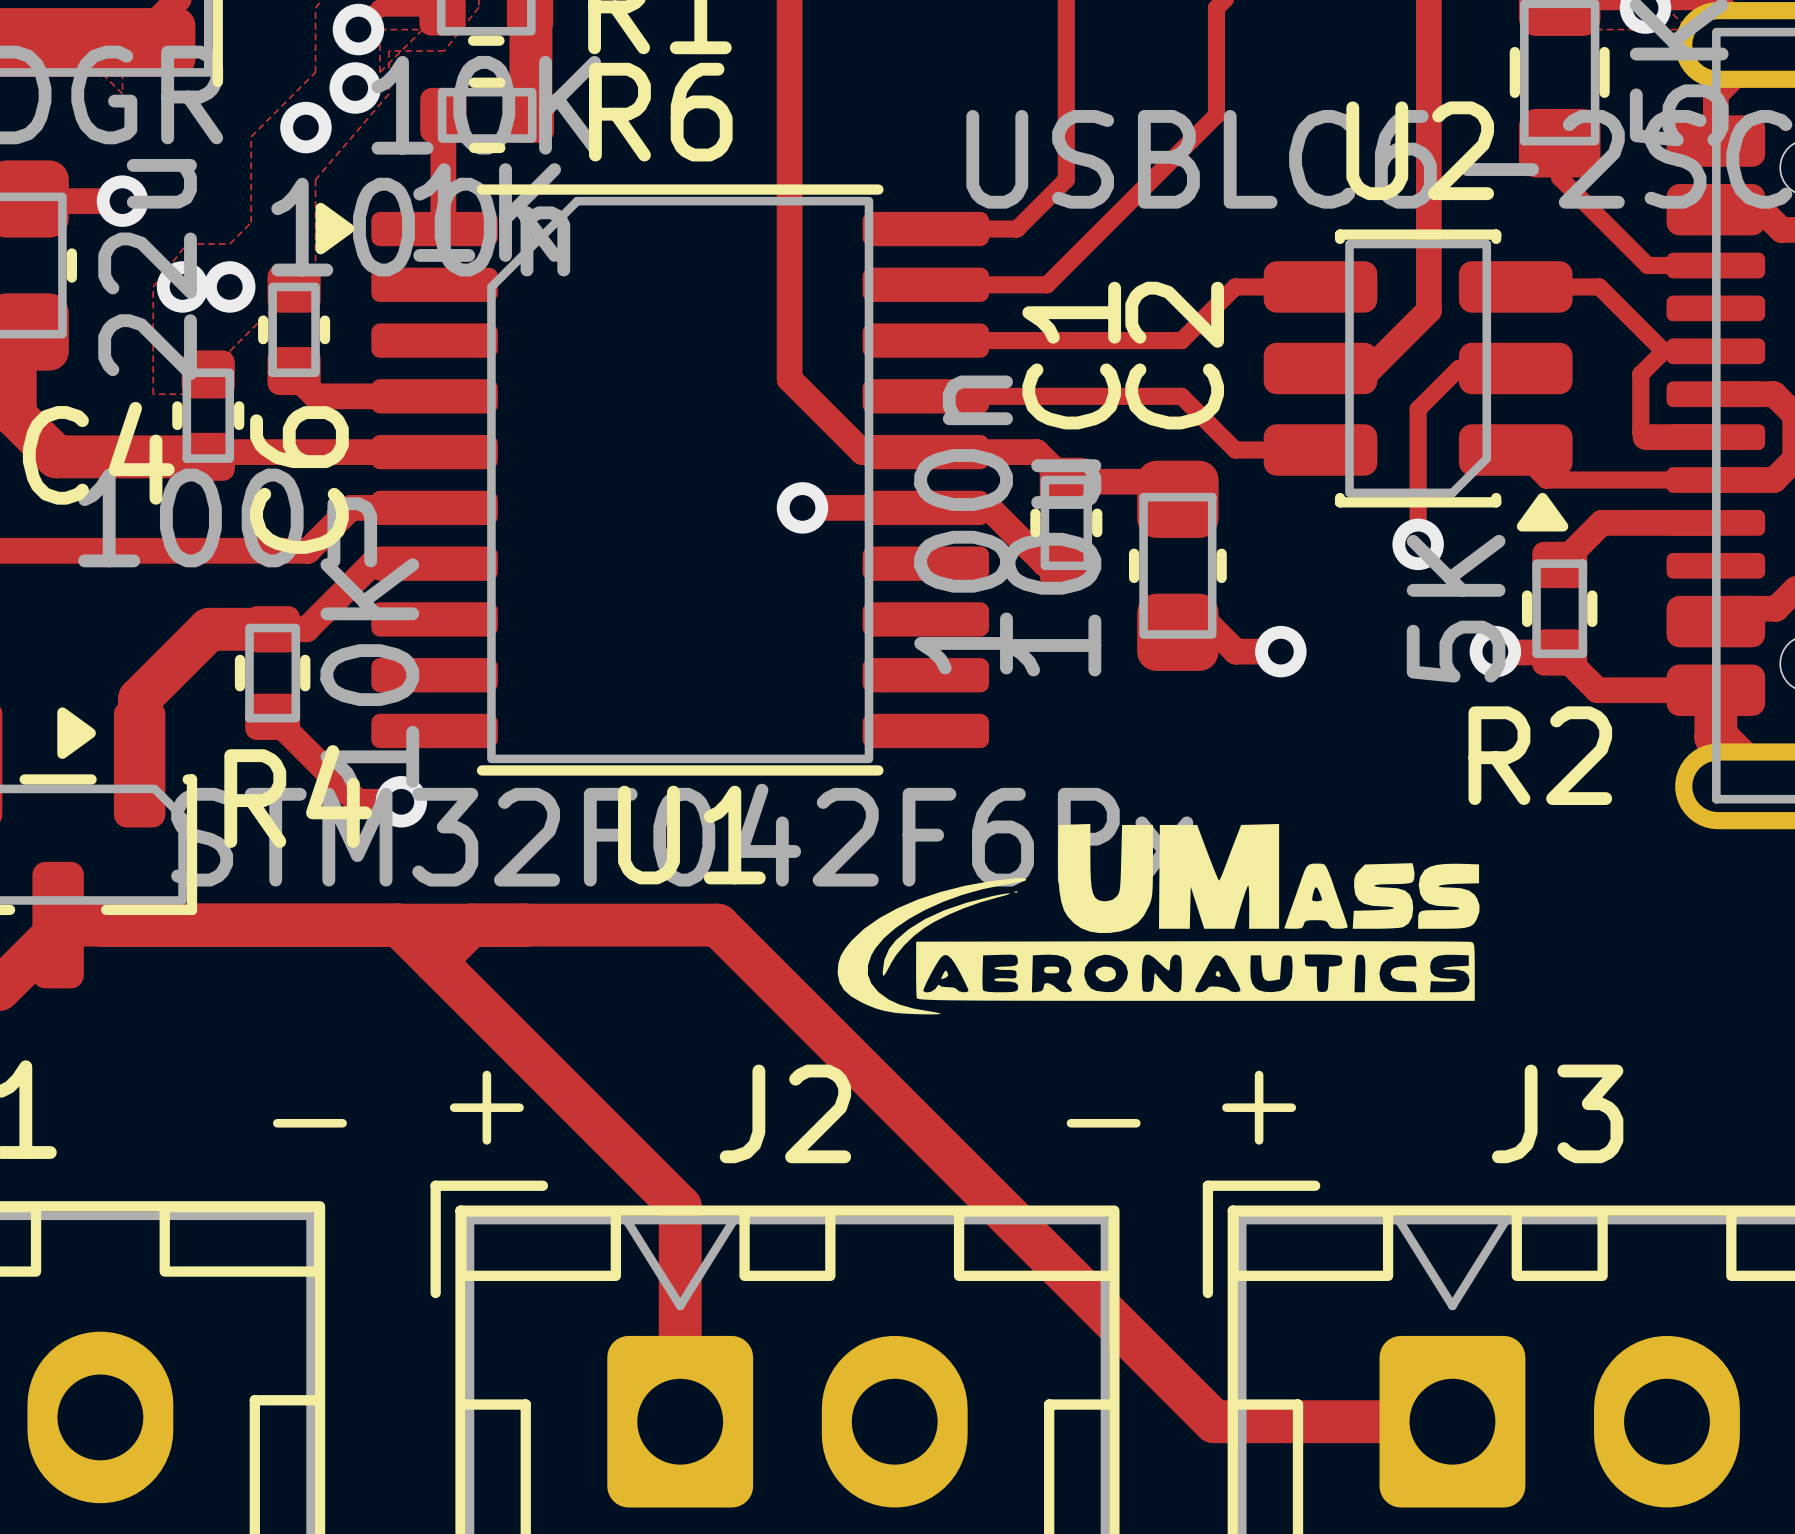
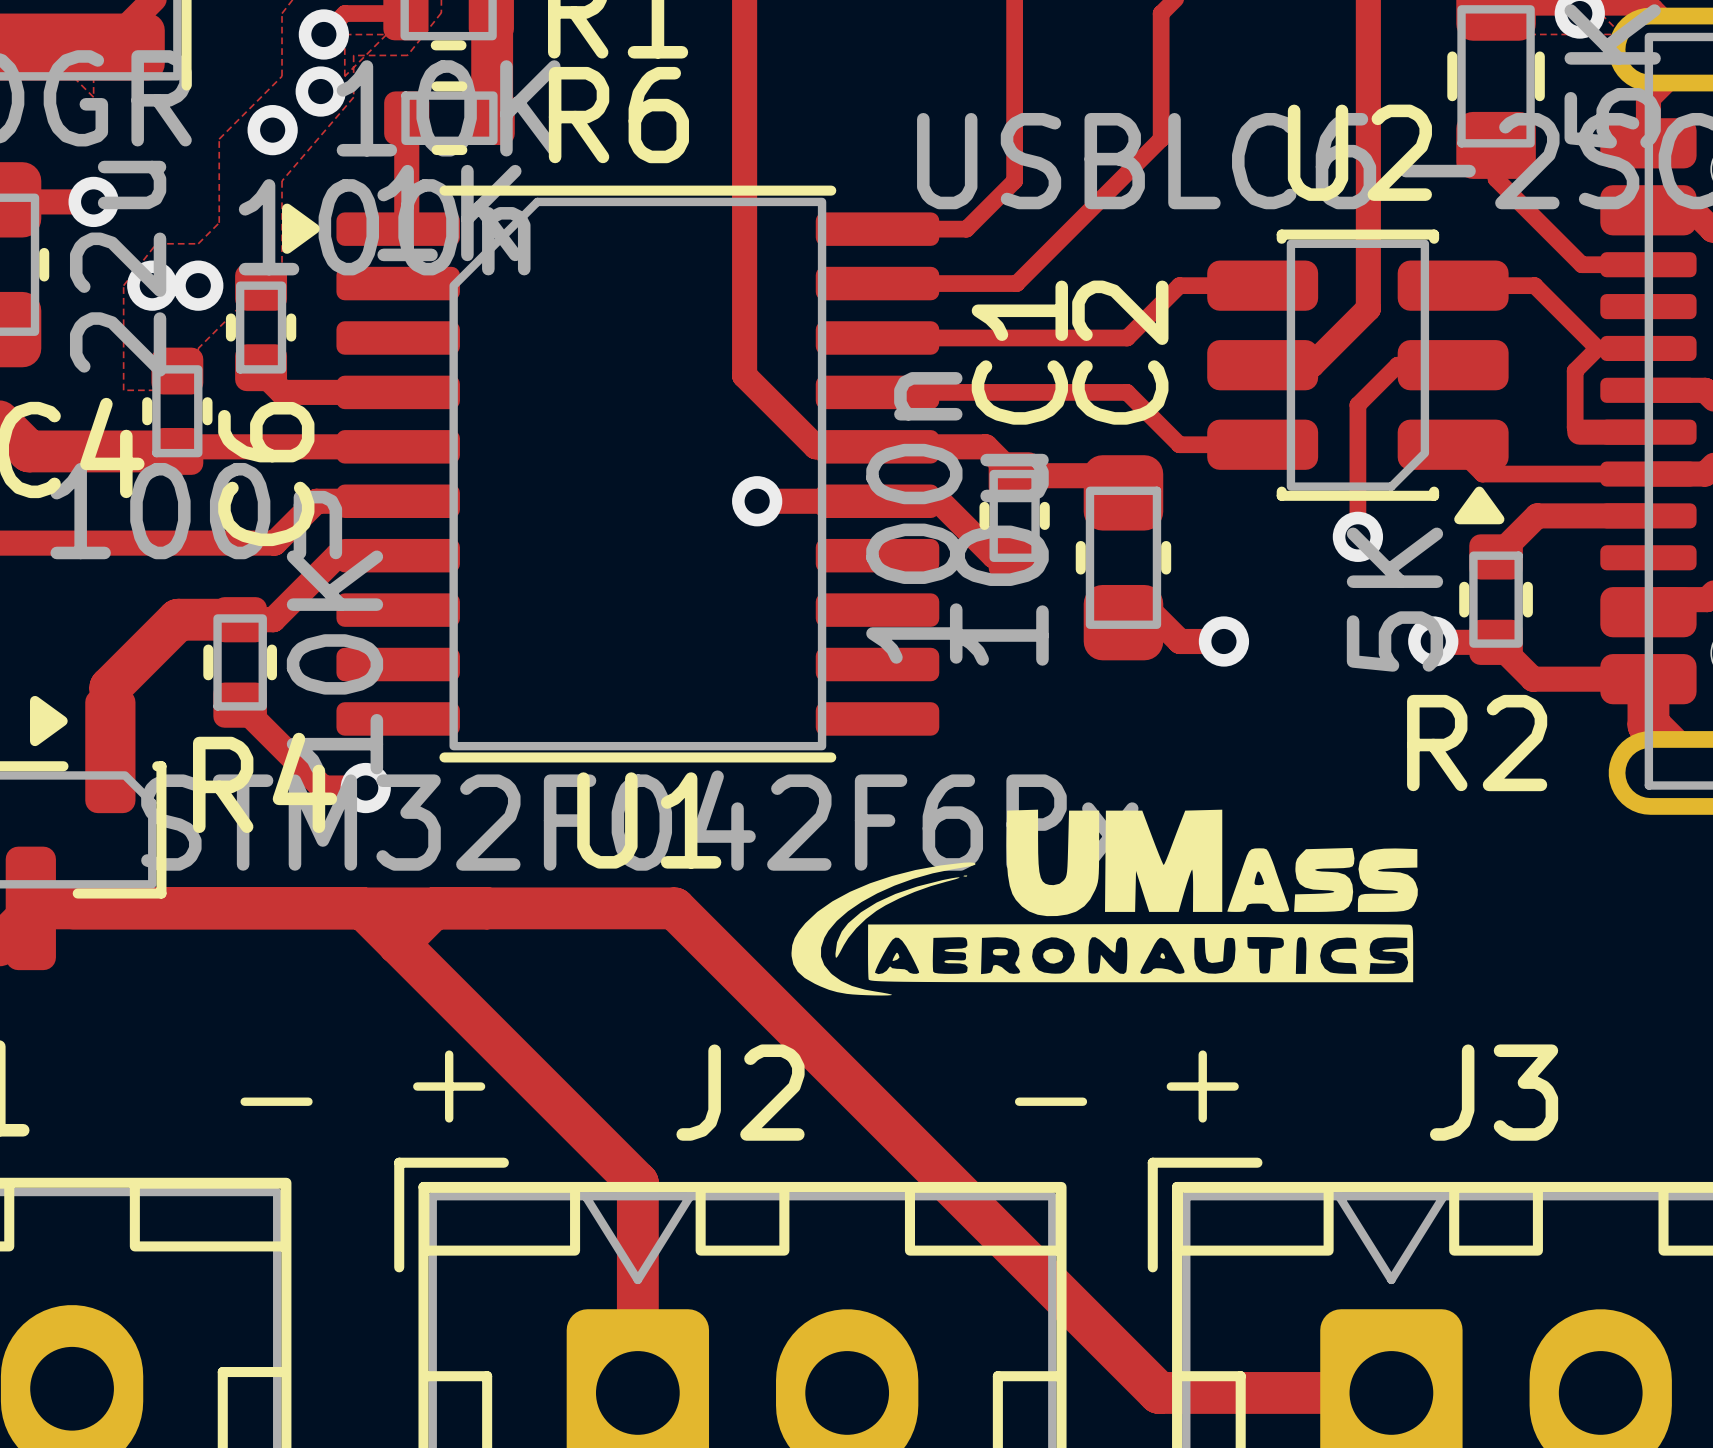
top track: (1216, 115) (1047, 284) -> (1161, 118) (1161, 139) (1016, 283) (995, 283)

